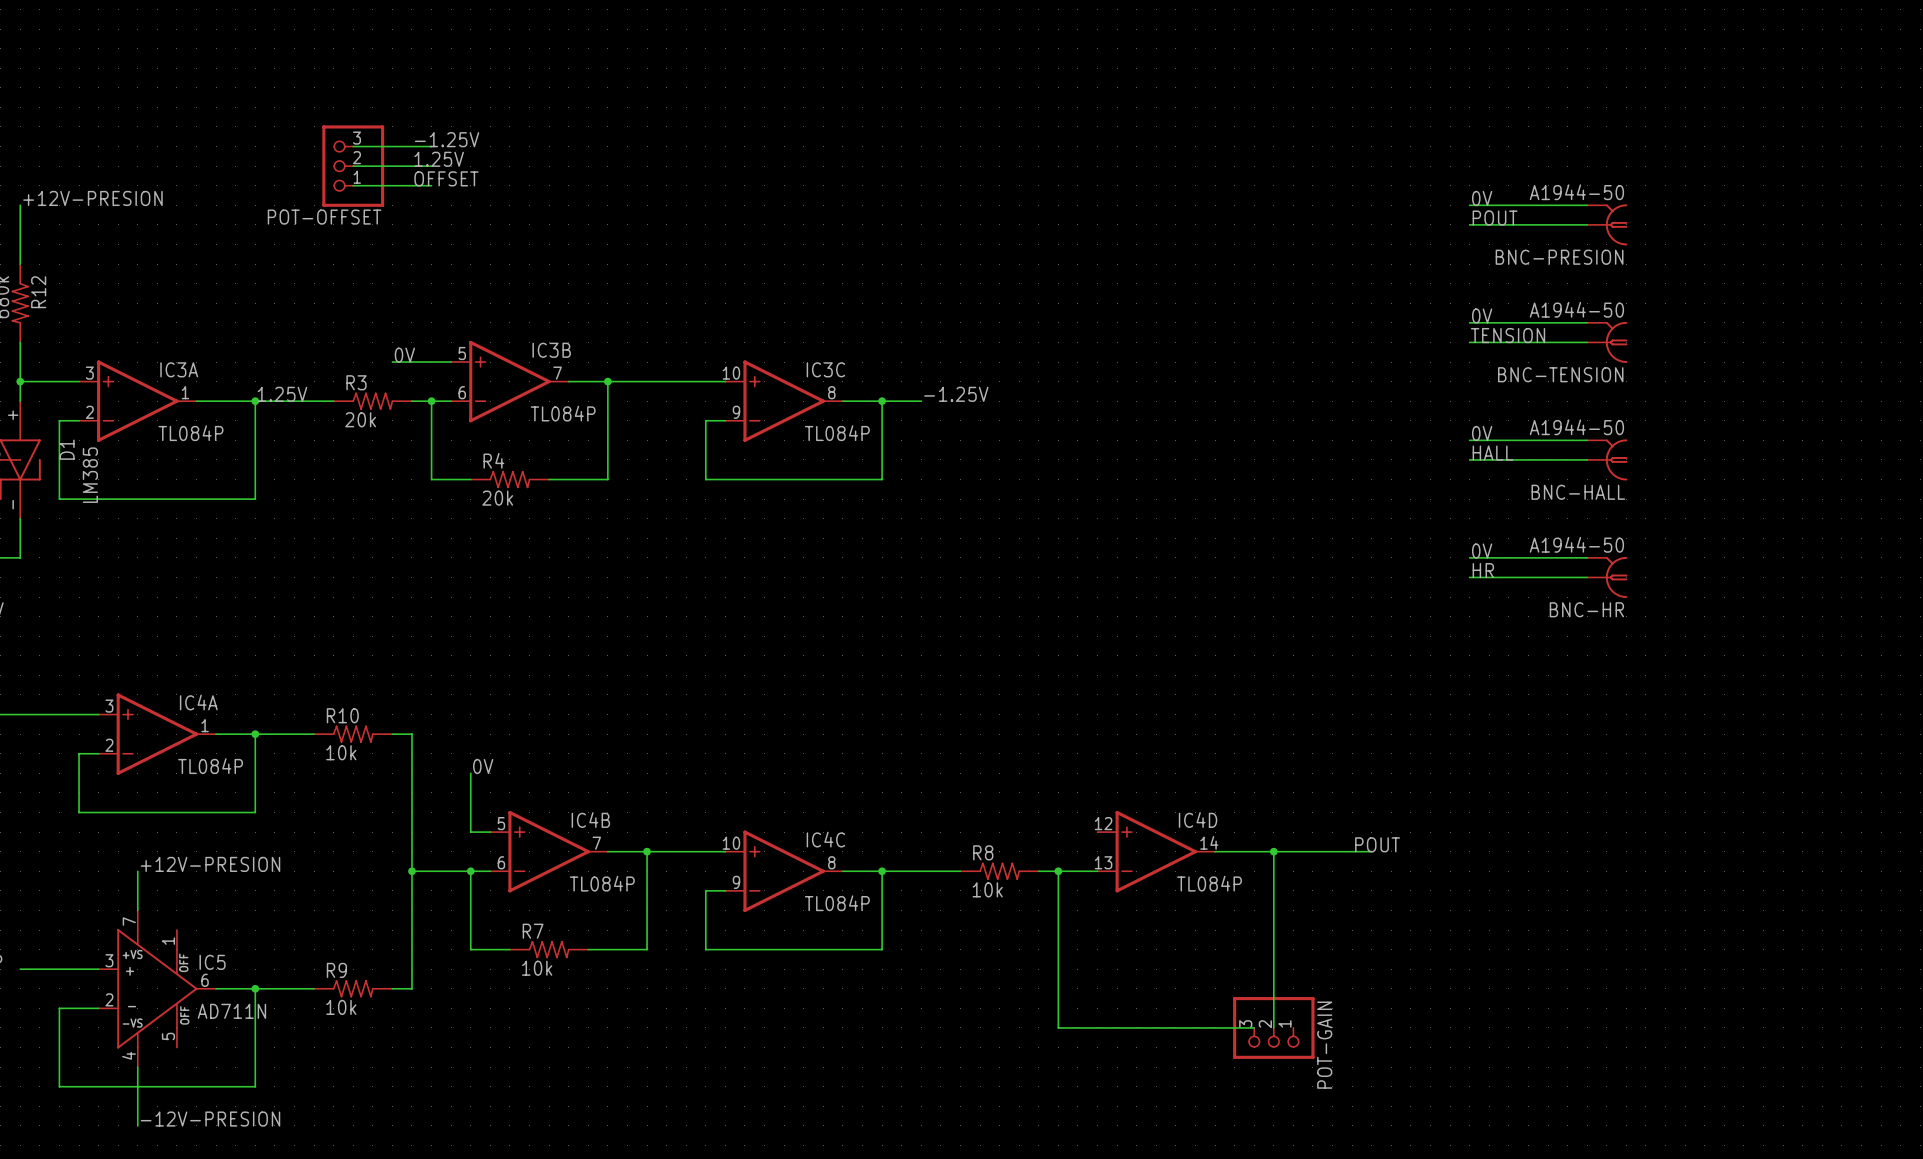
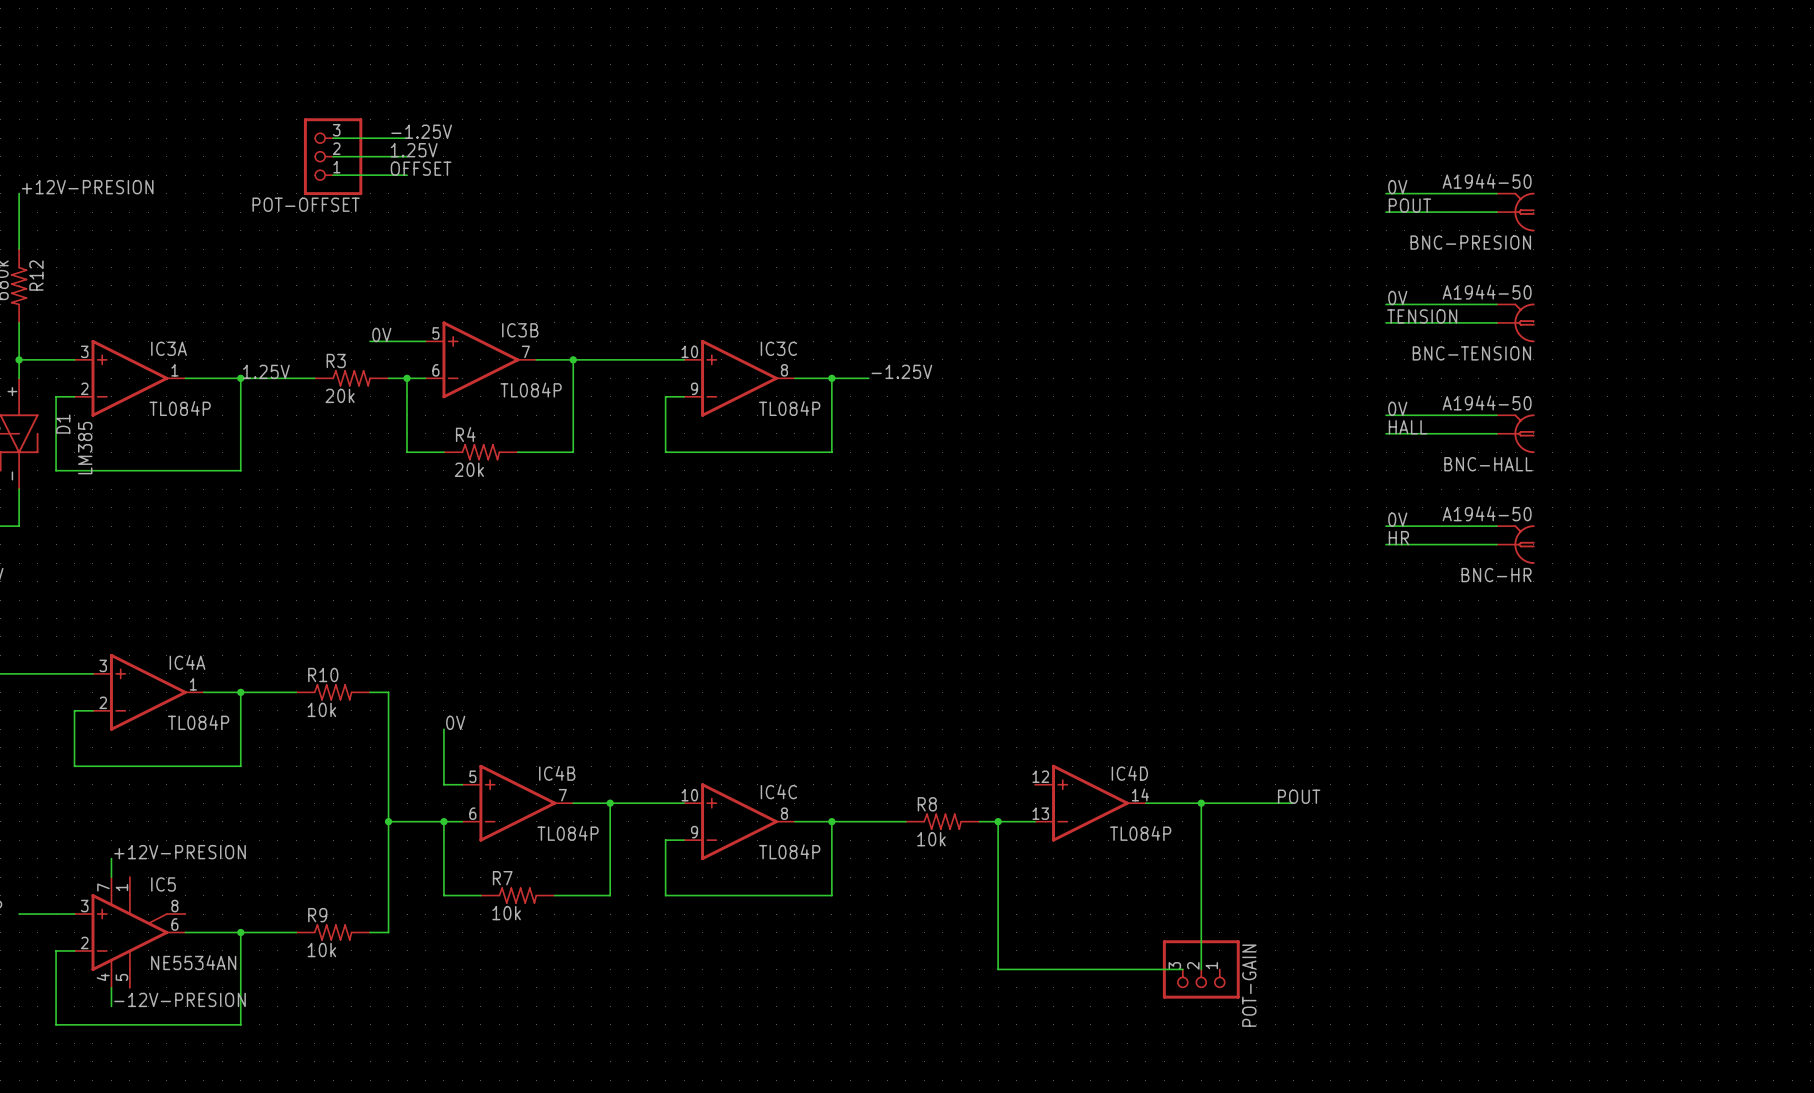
label position: +12V-PRESION (210, 864) -> +12V-PRESION (180, 852)
wire: (137, 871) (137, 910) -> none
IC5 symbol: [98, 910, 217, 1068] -> [74, 877, 186, 988]
wire: none -> (111, 858) (111, 877)
IC5 name position: IC5 (212, 962) -> IC5 (163, 884)
IC5 value: AD711N (231, 1011) -> NE5534AN (193, 962)
wire: none -> (111, 987) (111, 1006)
wire: (137, 1067) (137, 1125) -> none
label position: -12V-PRESION (210, 1119) -> -12V-PRESION (180, 999)

